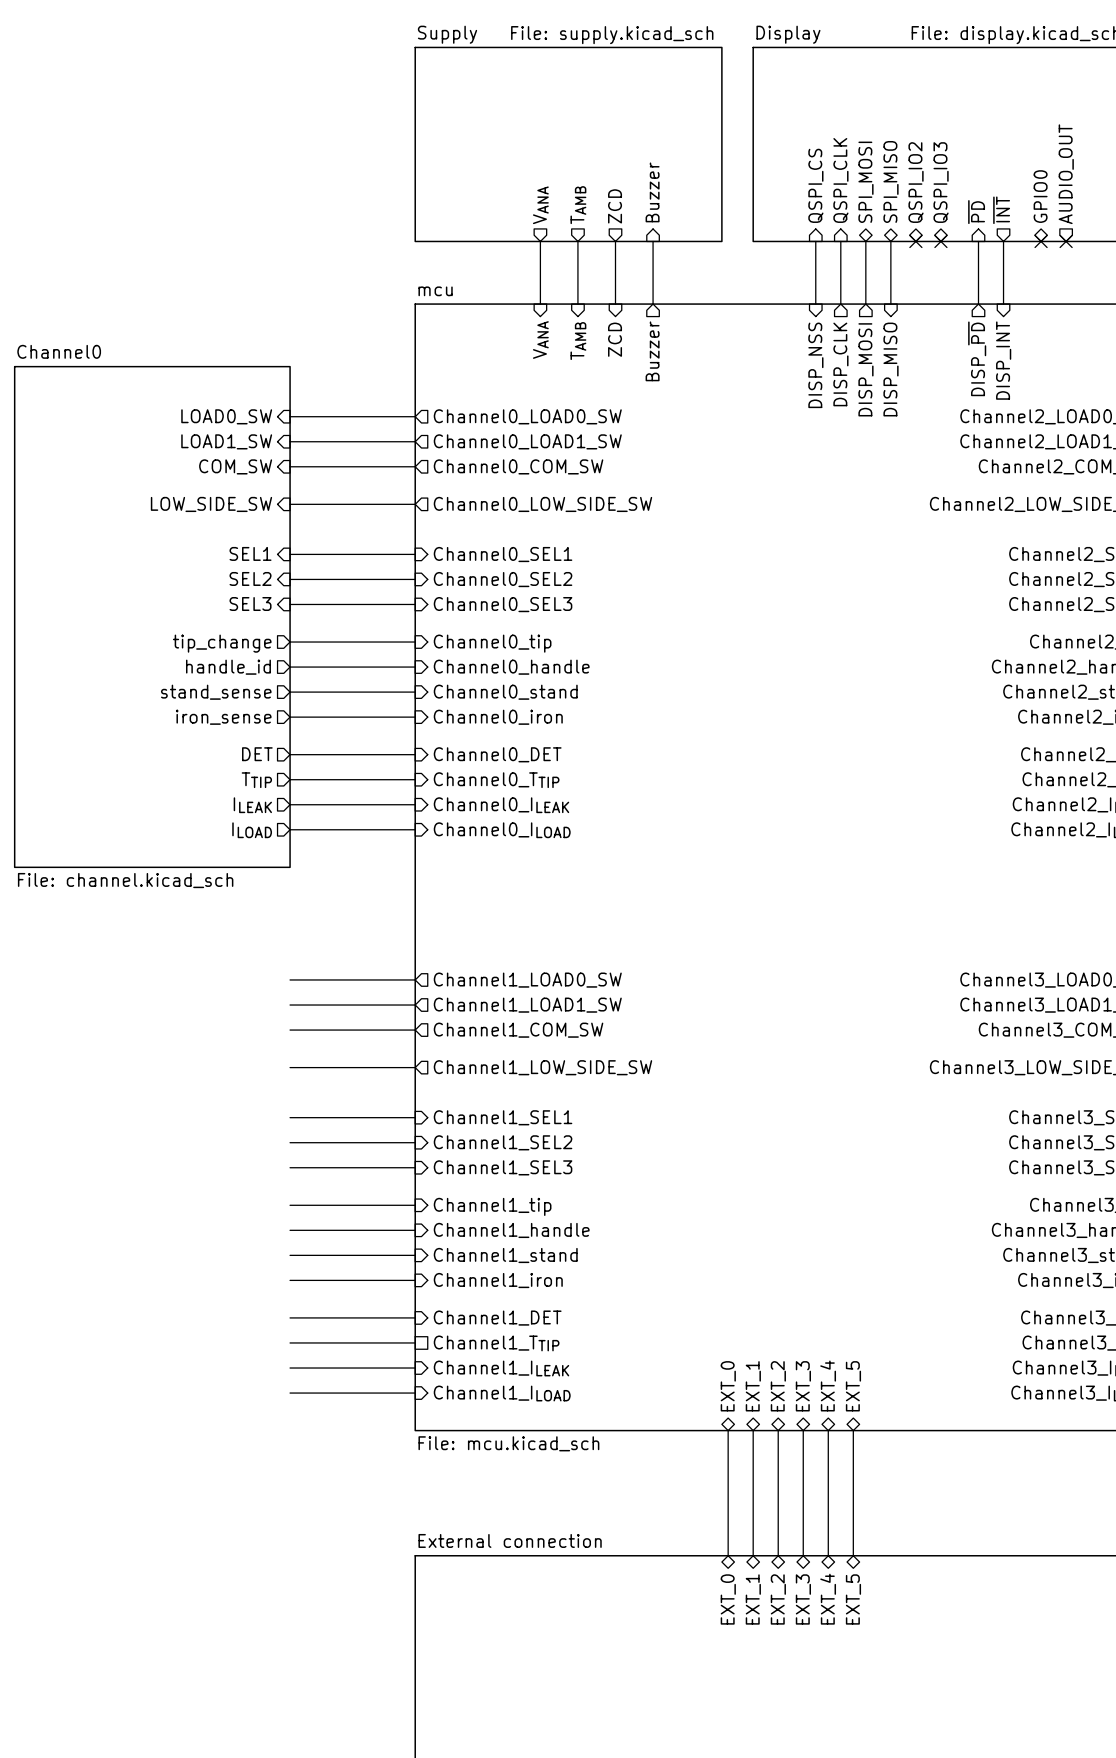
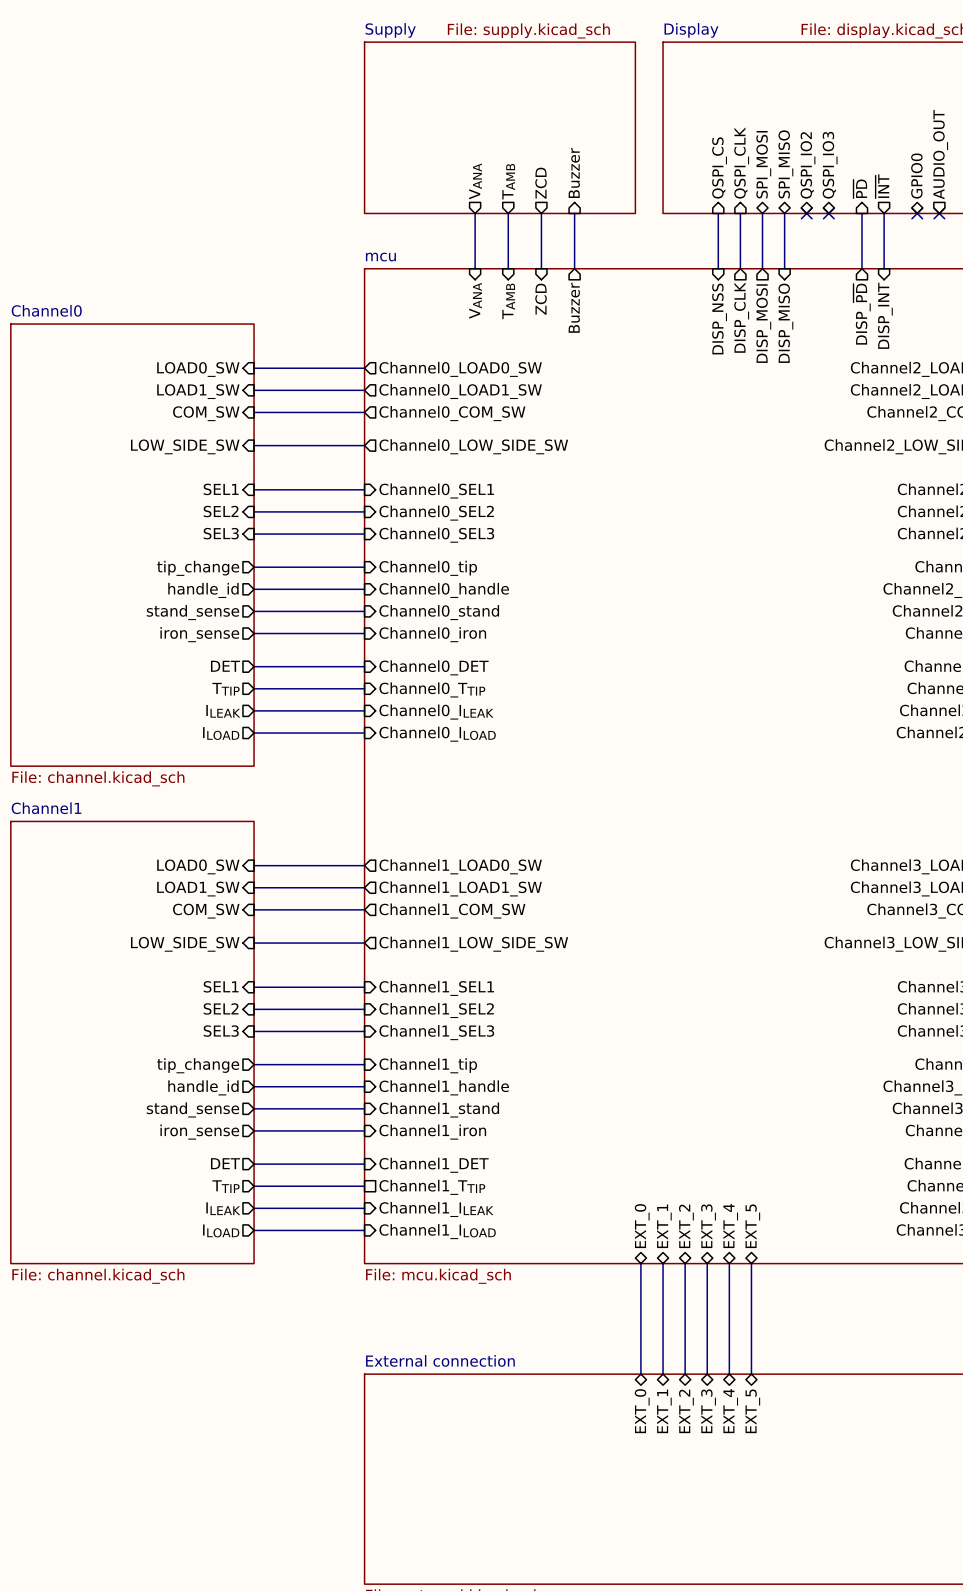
sheet pin: none -> LOAD0_SW (198, 866)
sheet pin: none -> LOAD1_SW (198, 889)
sheet pin: none -> COM_SW (206, 911)
sheet pin: none -> LOW_SIDE_SW (185, 944)
sheet pin: none -> SEL1 (221, 986)
sheet pin: none -> SEL2 (221, 1008)
sheet pin: none -> SEL3 (221, 1031)
sheet Channel1: none -> File: channel.kicad_sch (132, 1042)
sheet pin: none -> tip_change (198, 1065)
sheet pin: none -> handle_id (203, 1087)
sheet pin: none -> stand_sense (192, 1109)
sheet pin: none -> iron_sense (199, 1132)
sheet pin: none -> DET (225, 1163)
sheet pin: none -> TTIP (225, 1186)
sheet pin: none -> ILEAK (223, 1208)
sheet pin: none -> ILOAD (221, 1230)

